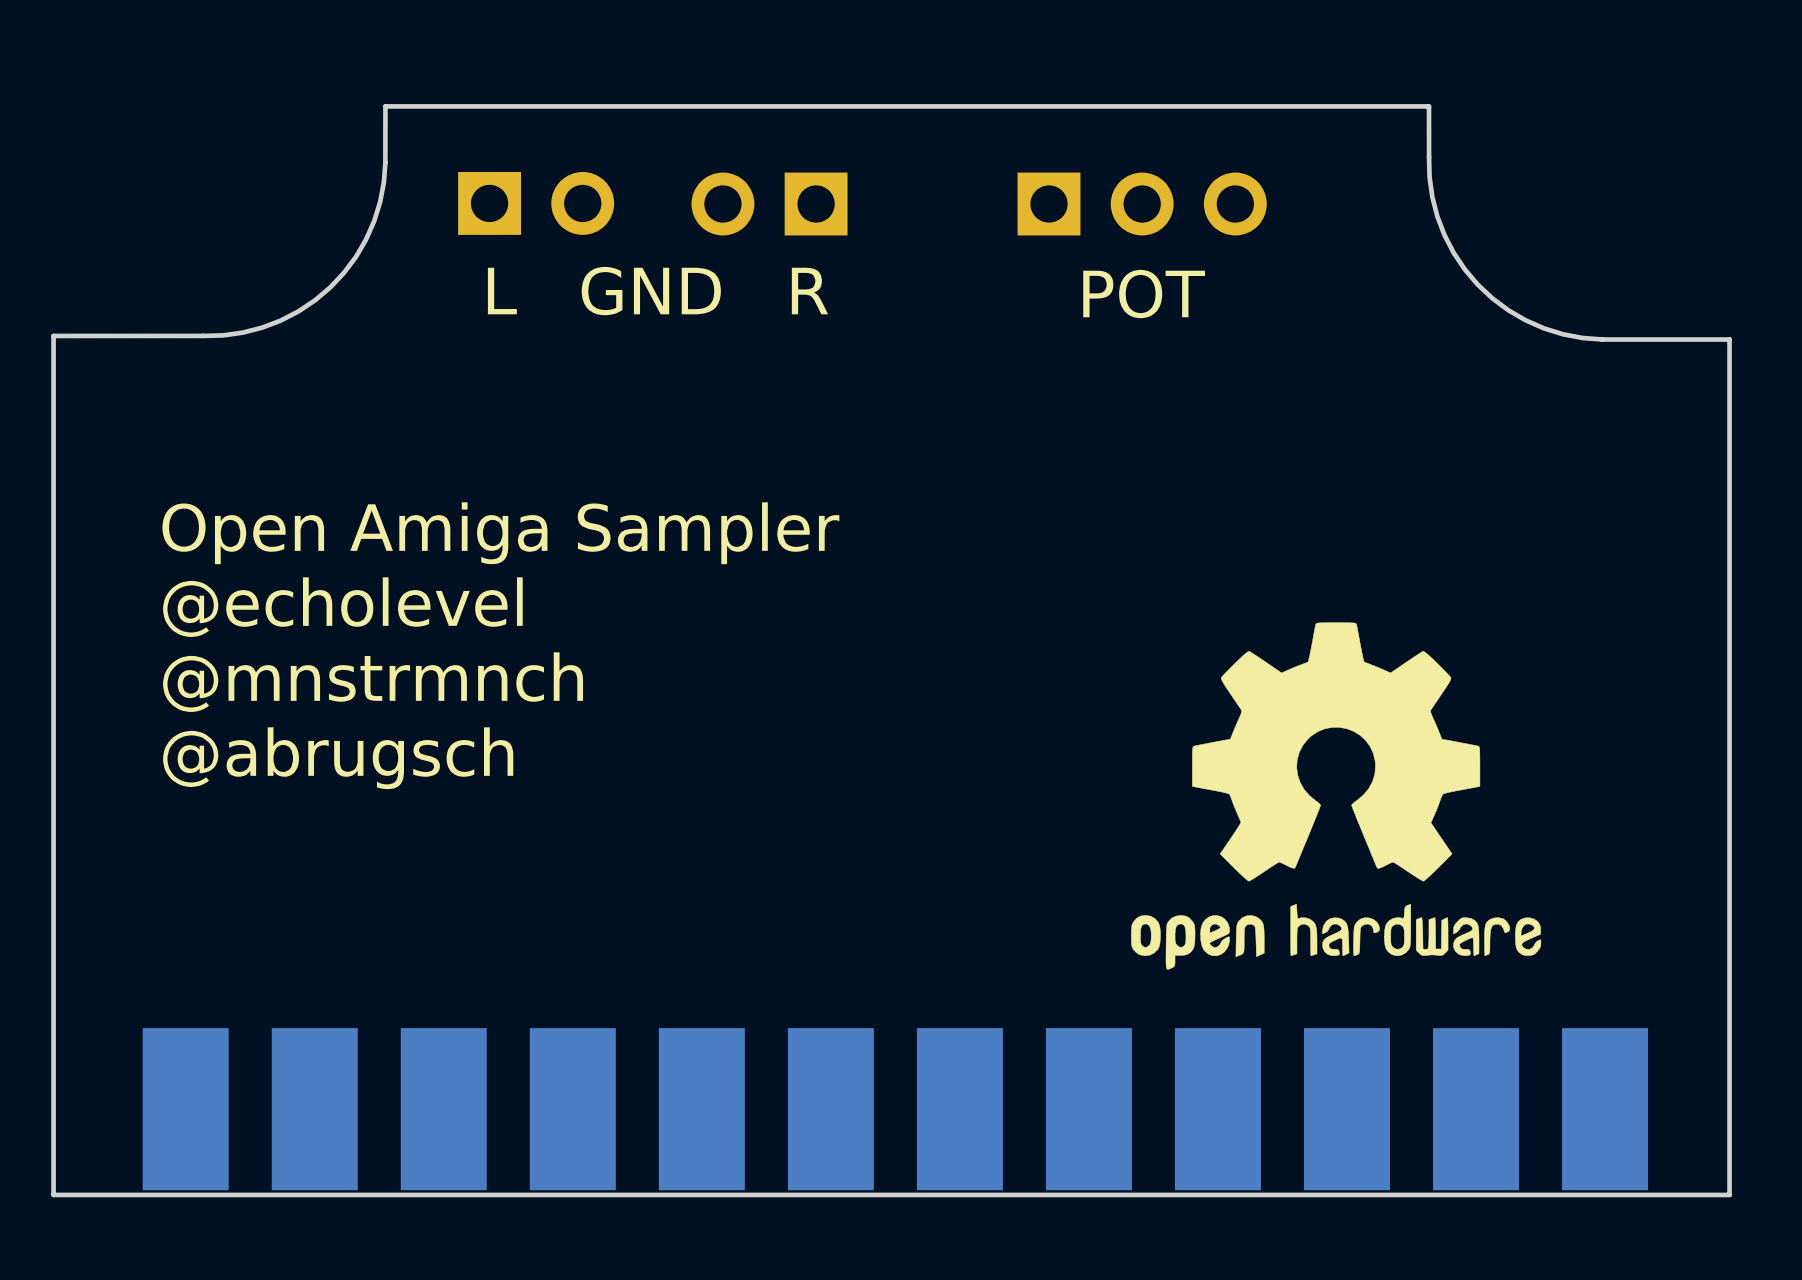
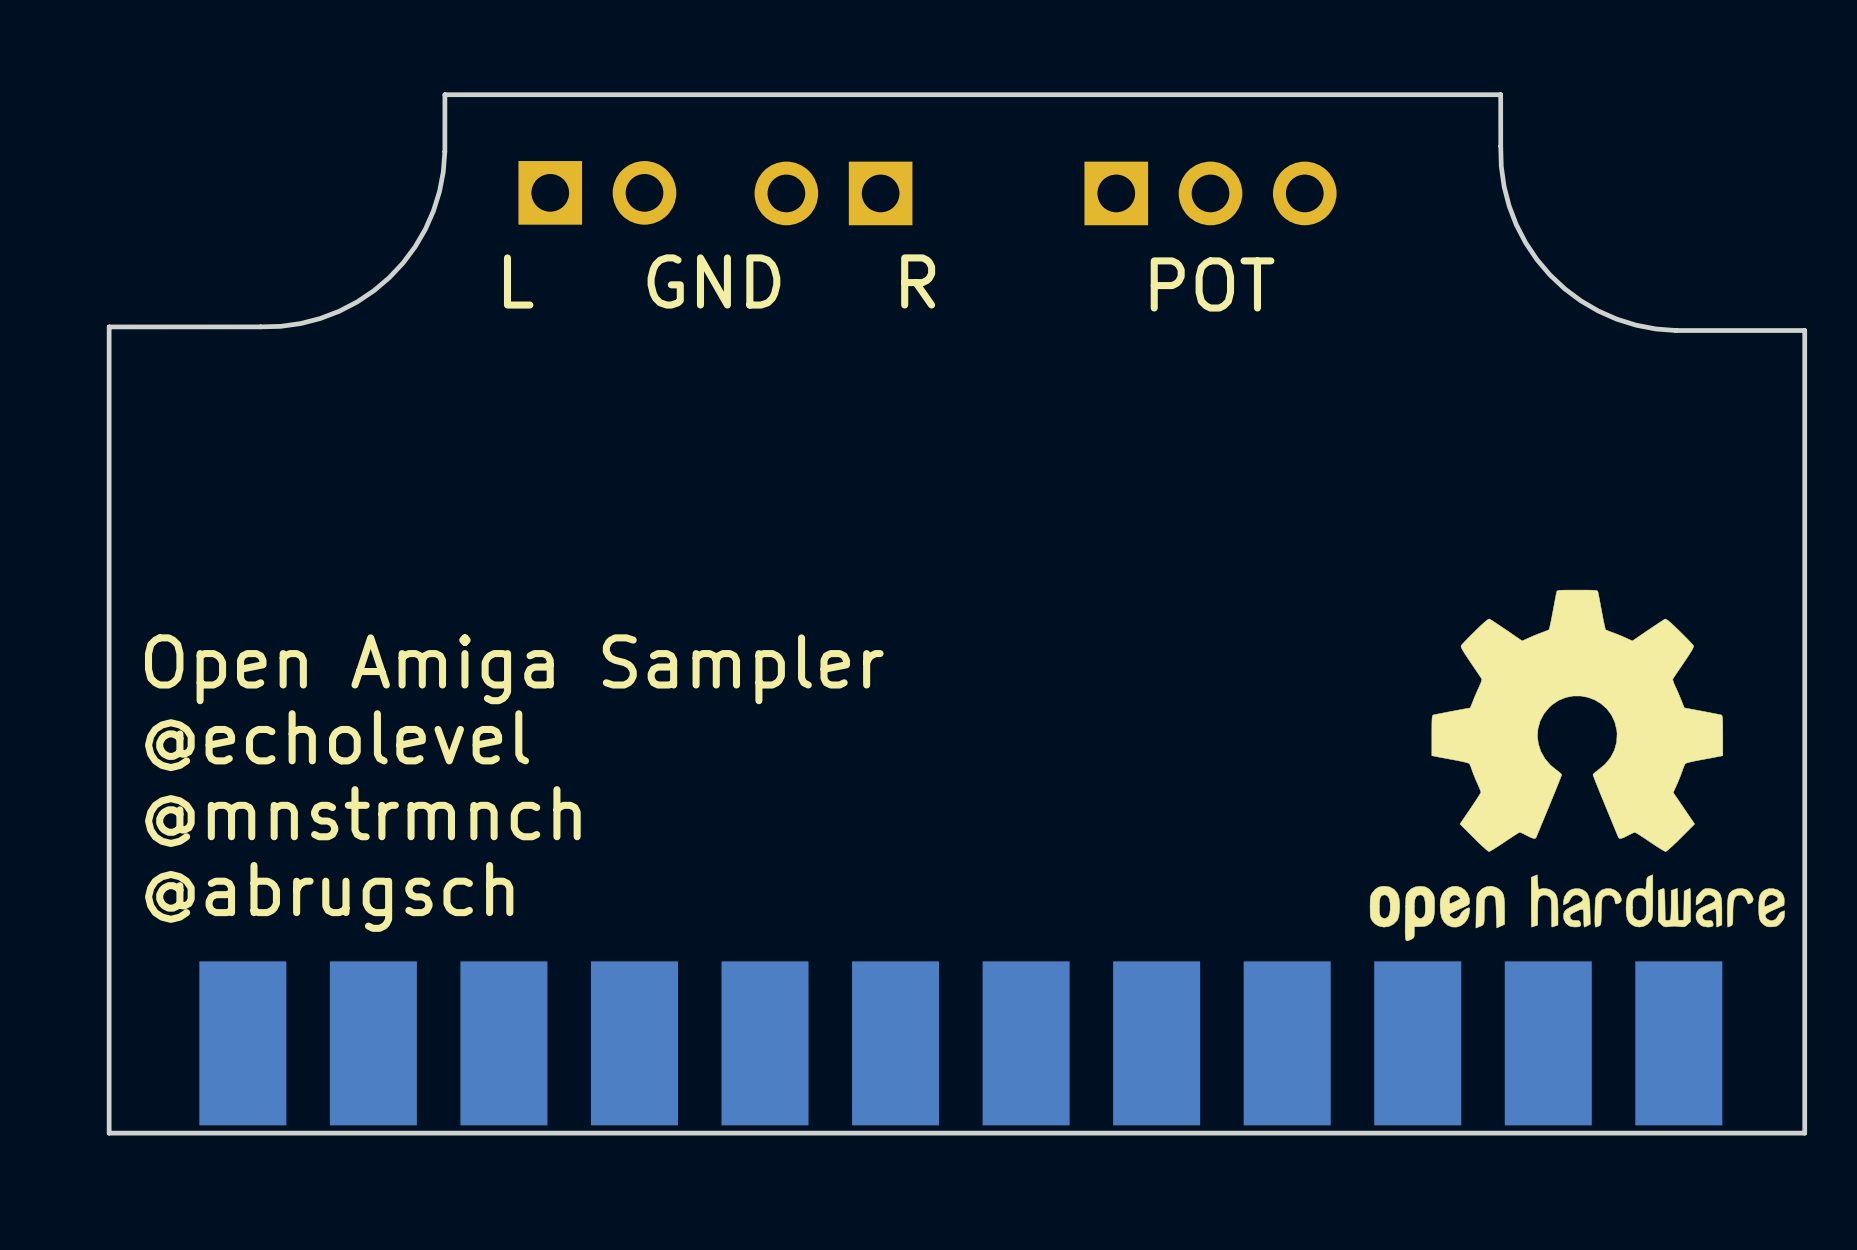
text position: Open Amiga Sampler (500, 533) -> Open Amiga Sampler (514, 669)
text position: @echolevel (342, 607) -> @echolevel (337, 740)
text position: @mnstrmnch (373, 682) -> @mnstrmnch (362, 816)
text position: @abrugsch (338, 758) -> @abrugsch (329, 896)
drawing position: (1336, 796) -> (1577, 765)
part position: (895, 1109) -> (960, 1043)
board edge: (1729, 1132) (1729, 1194) (53, 1194) (53, 1132) -> (1804, 1133) (109, 1133)

